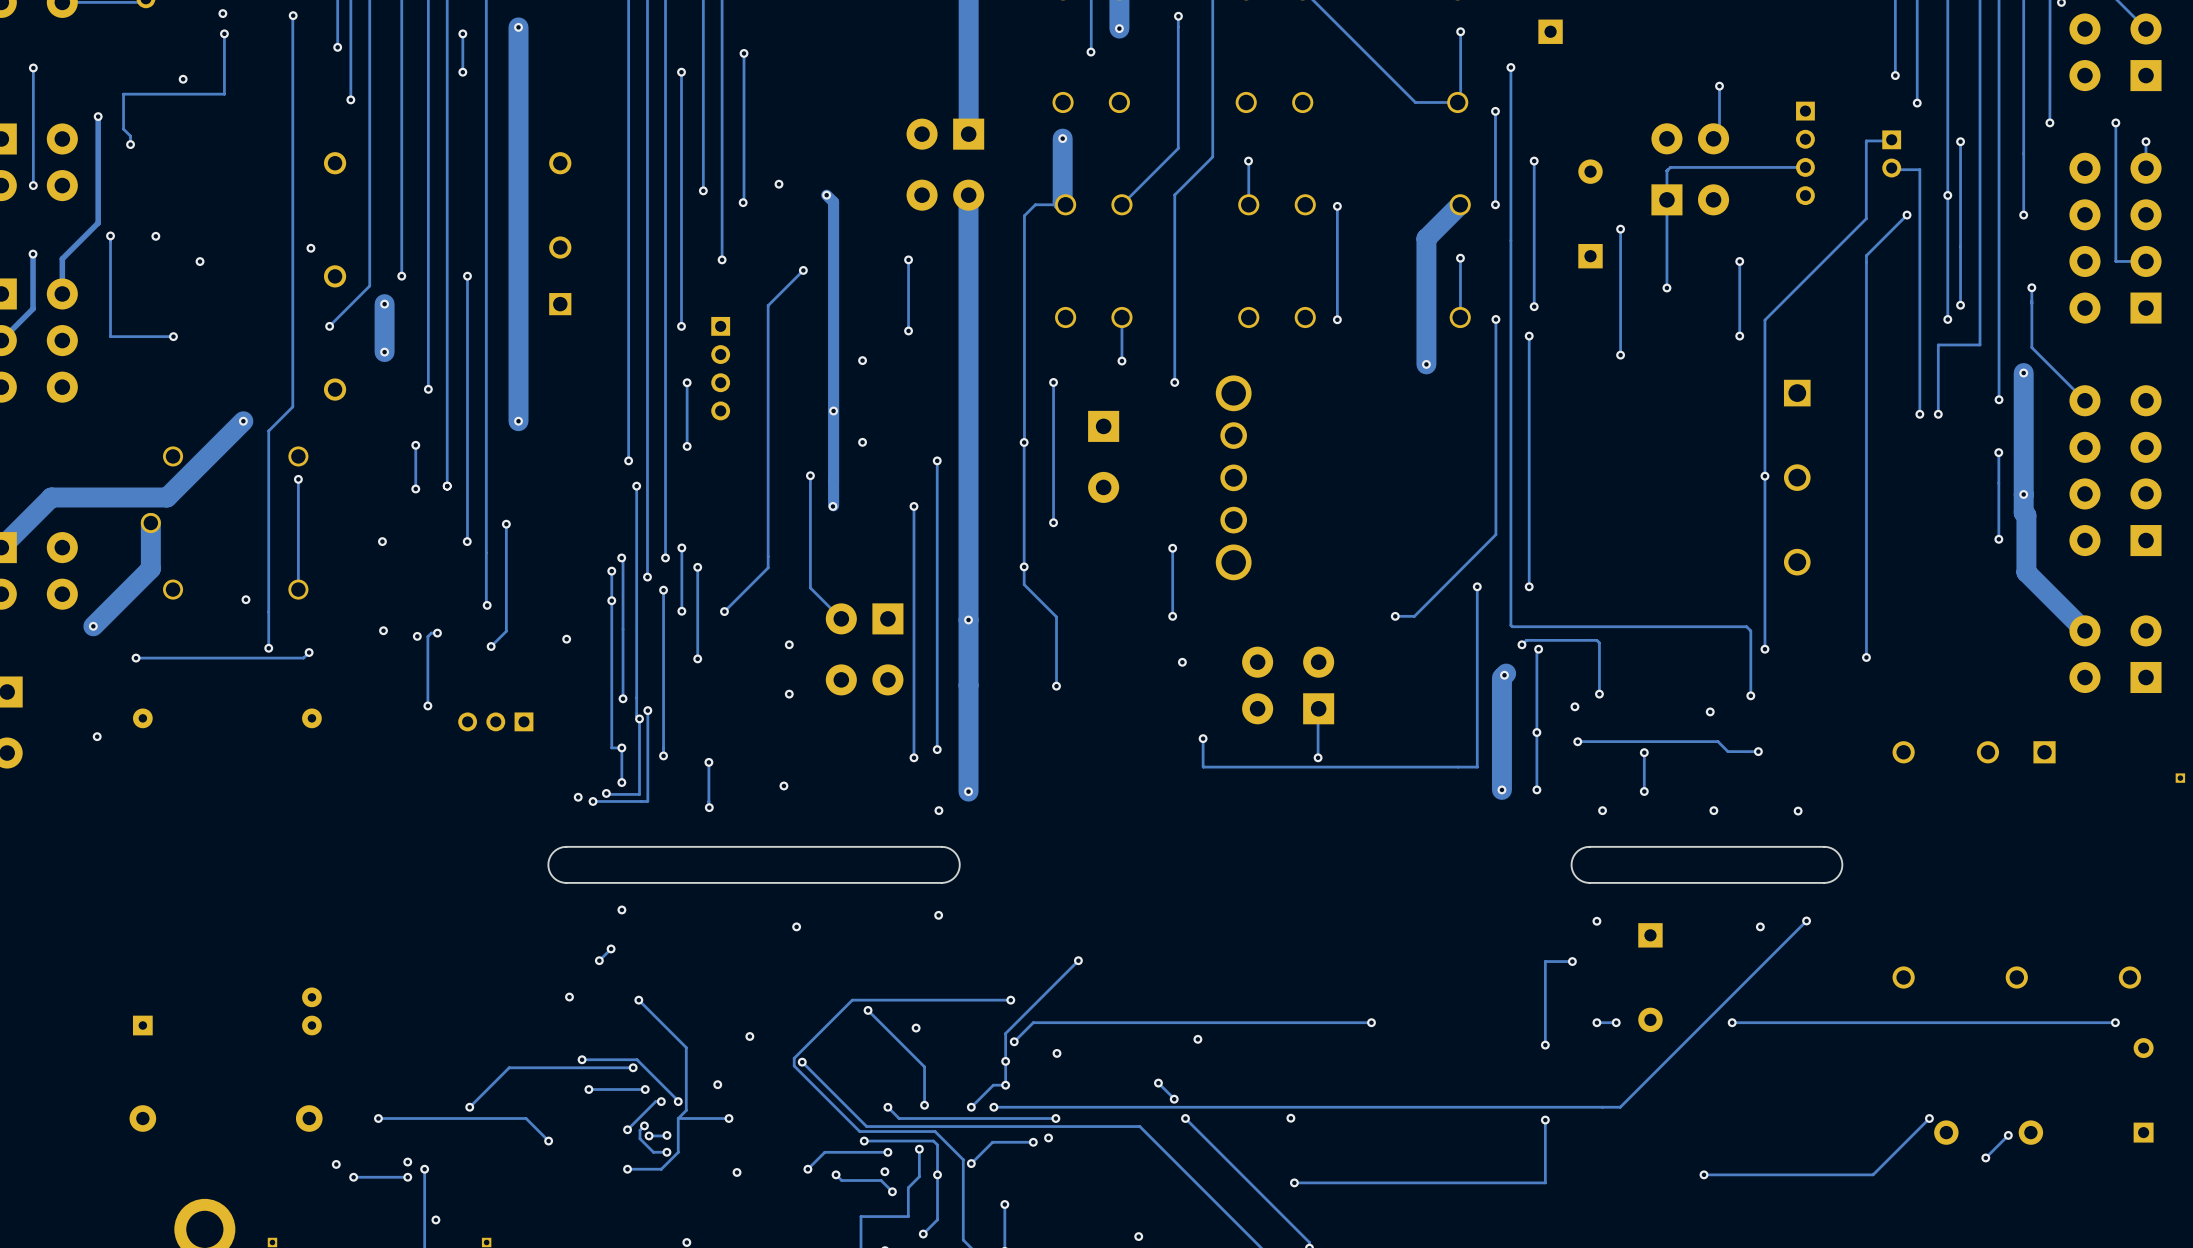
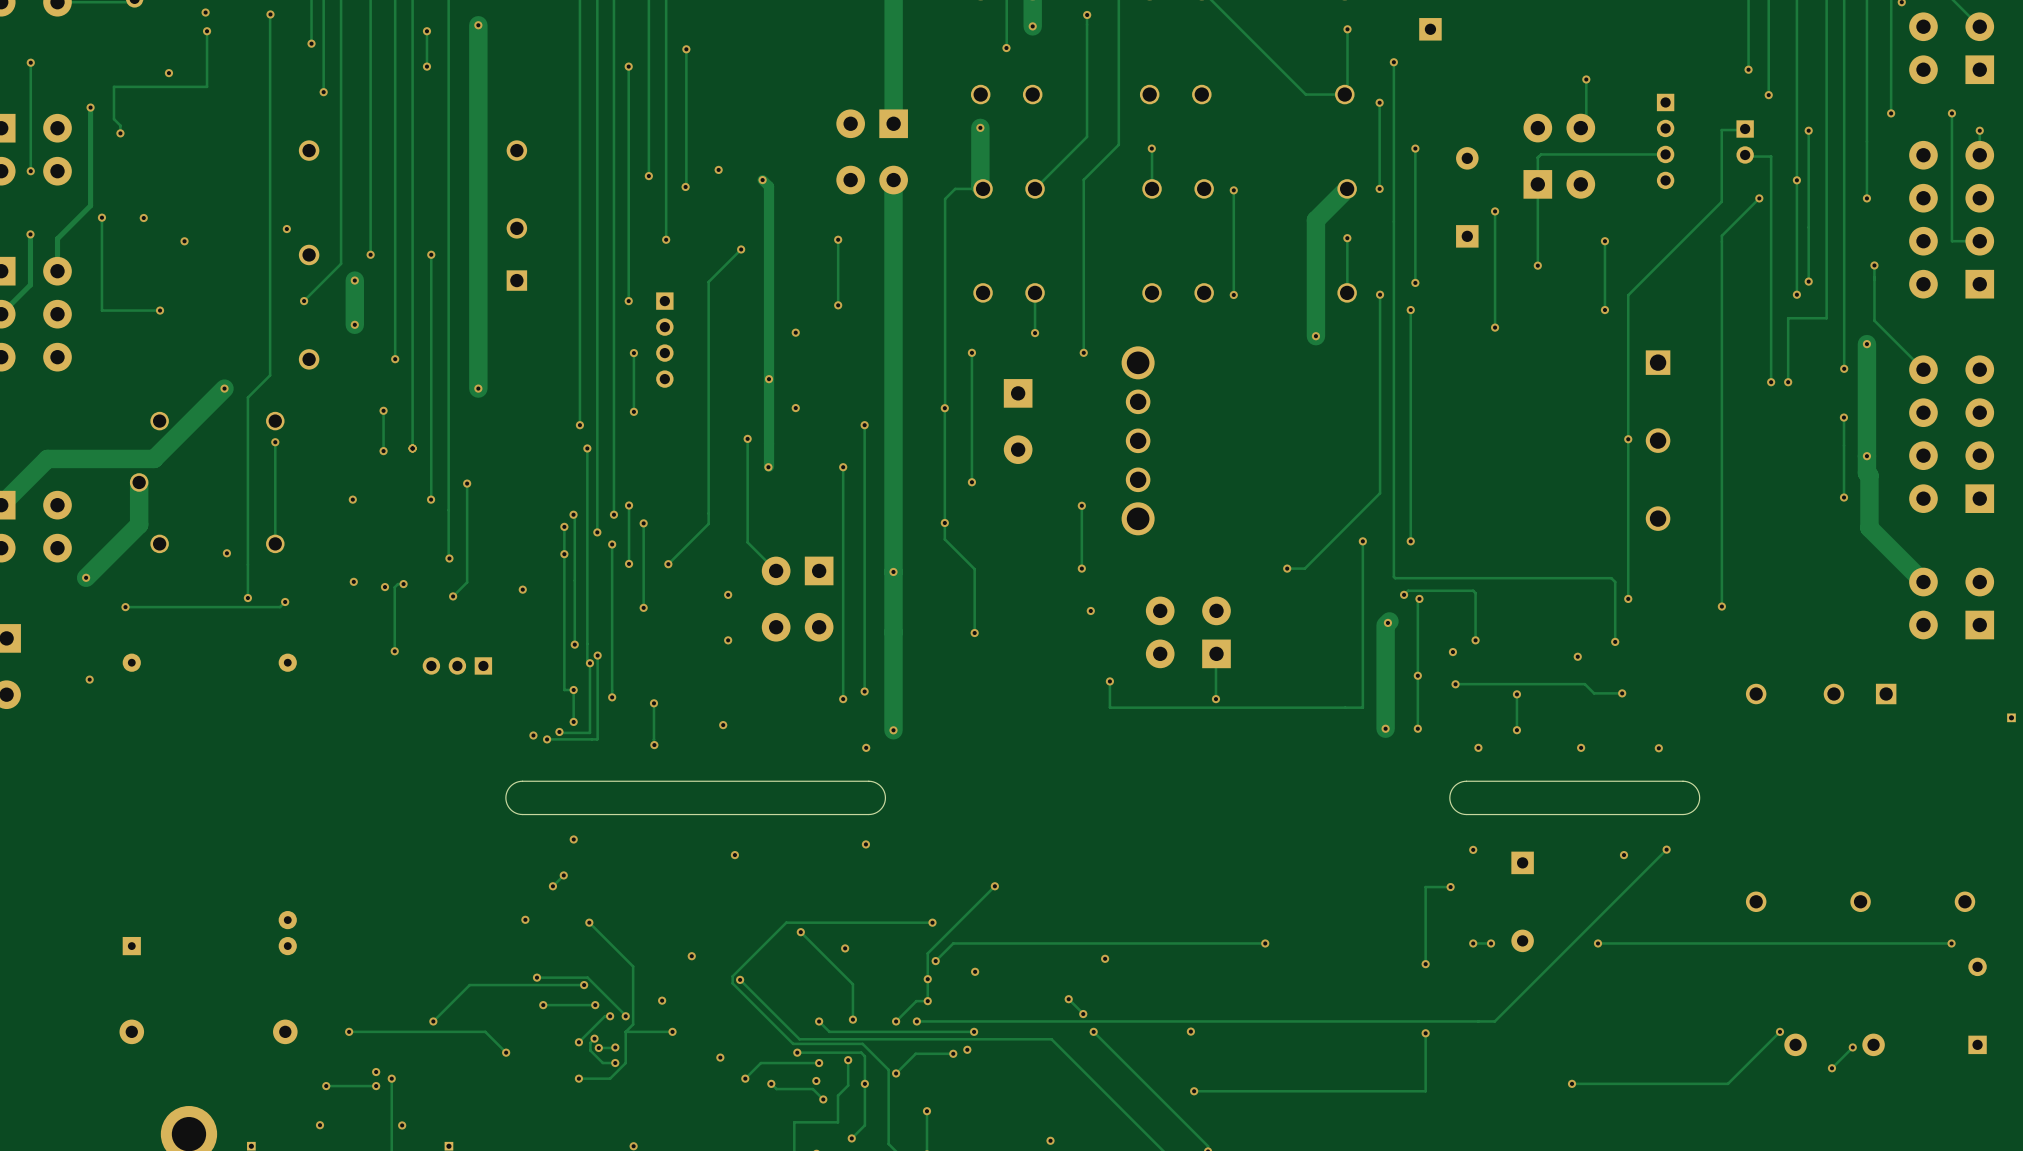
via position: (336, 1164) -> (320, 1125)
via position: (737, 1172) -> (720, 1057)

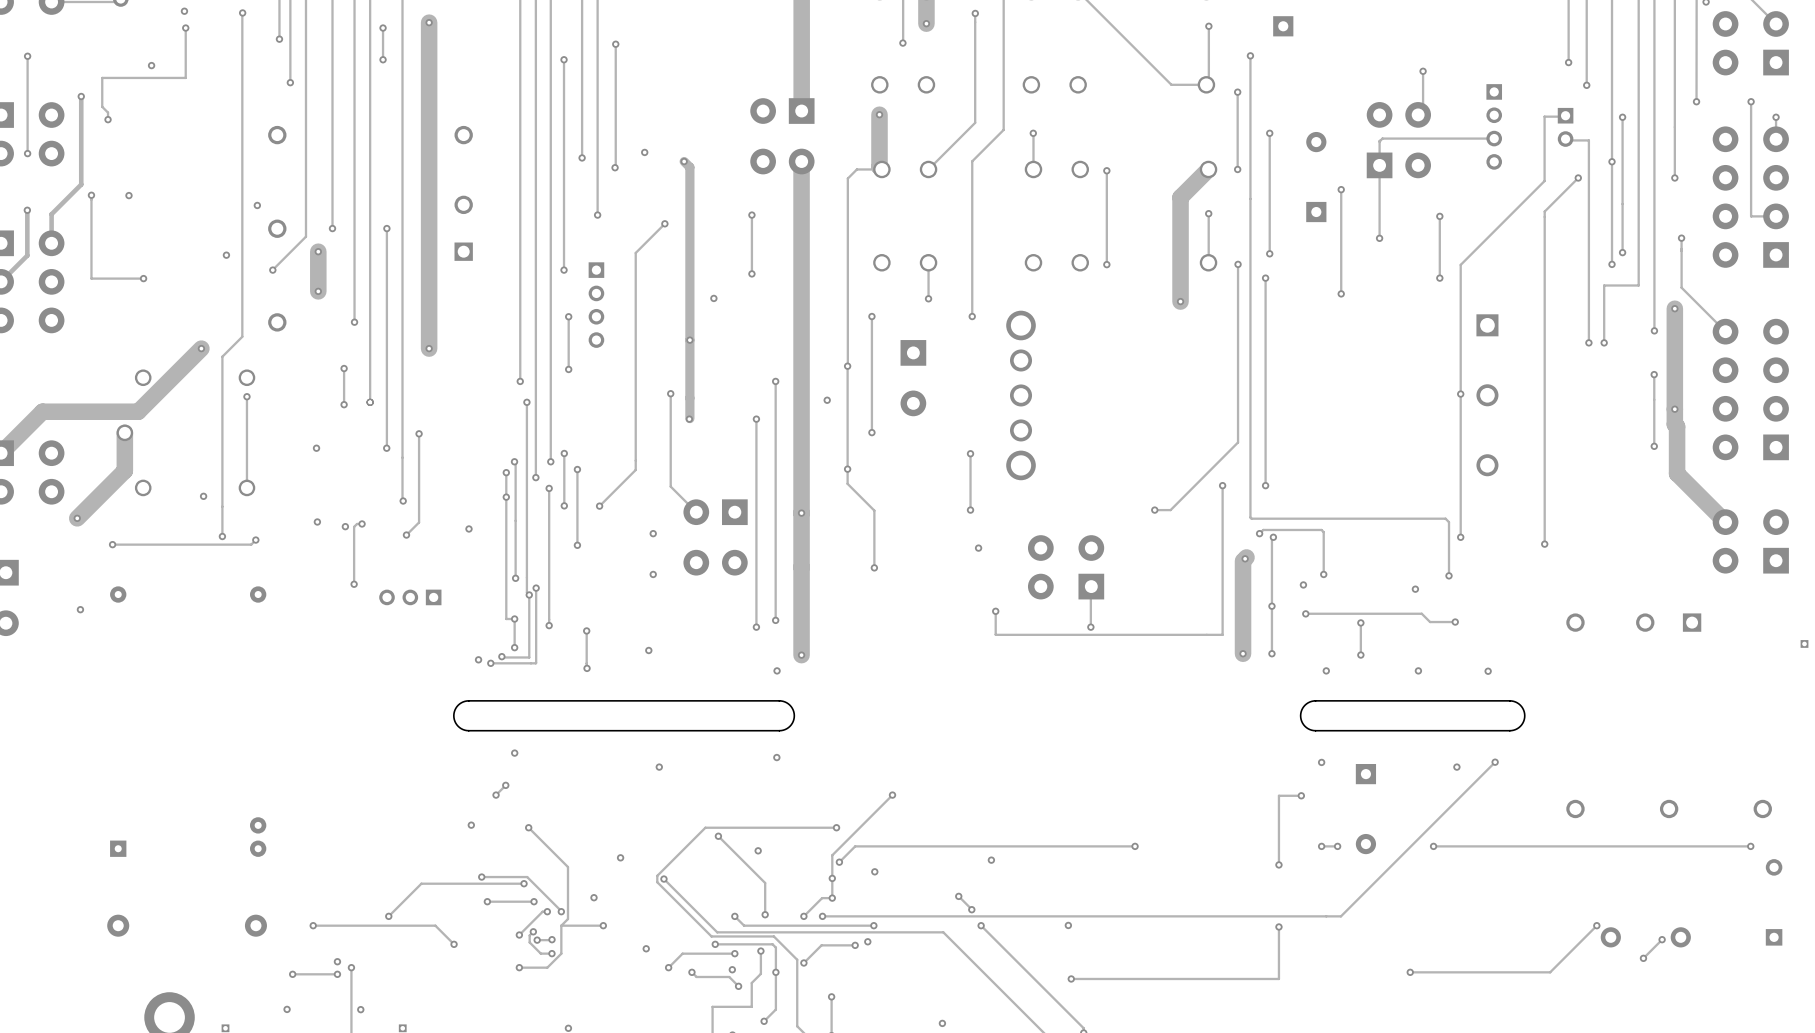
via: (184, 241) -> none
via: none -> (226, 255)
via: (795, 408) -> none
via: none -> (827, 400)

